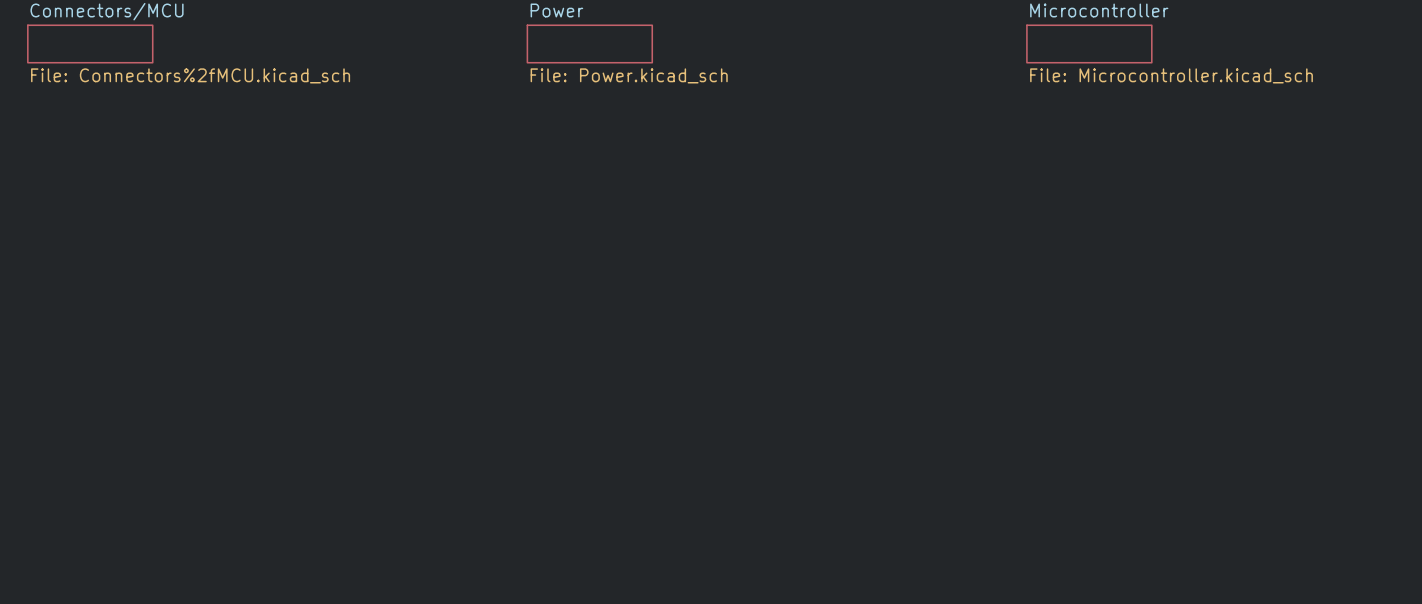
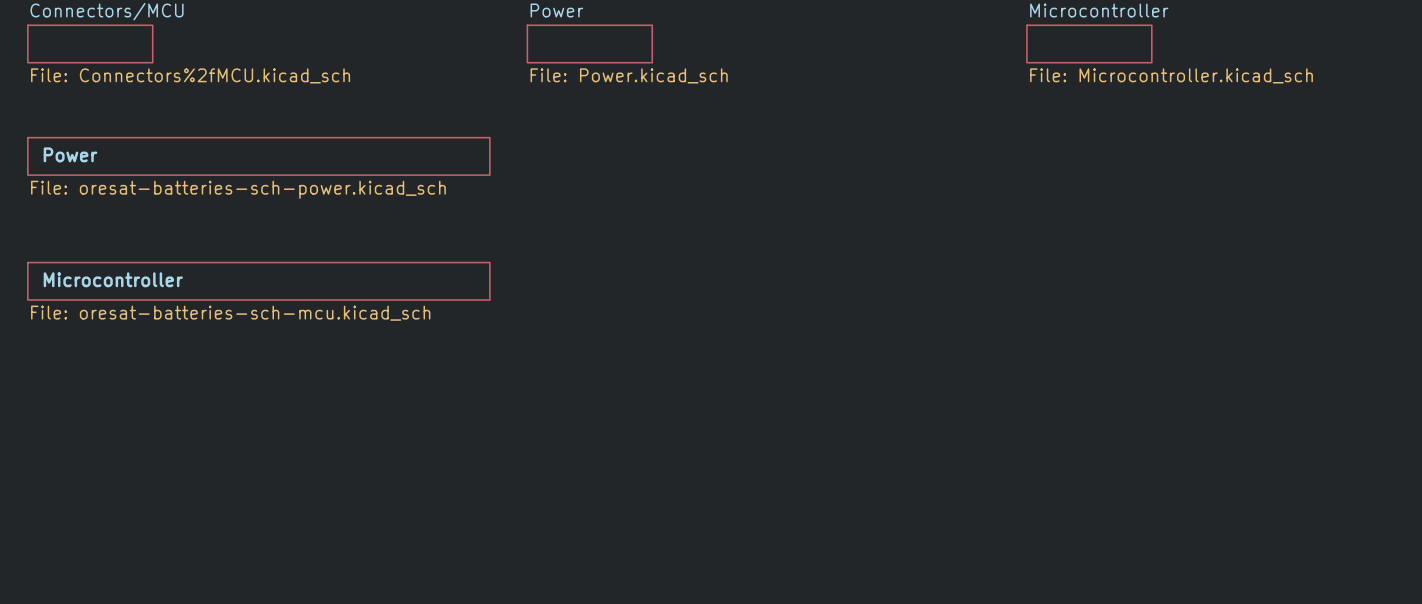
sheet Power: none -> File: oresat-batteries-sch-power.kicad_sch (258, 156)
sheet Microcontroller: none -> File: oresat-batteries-sch-mcu.kicad_sch (258, 281)

